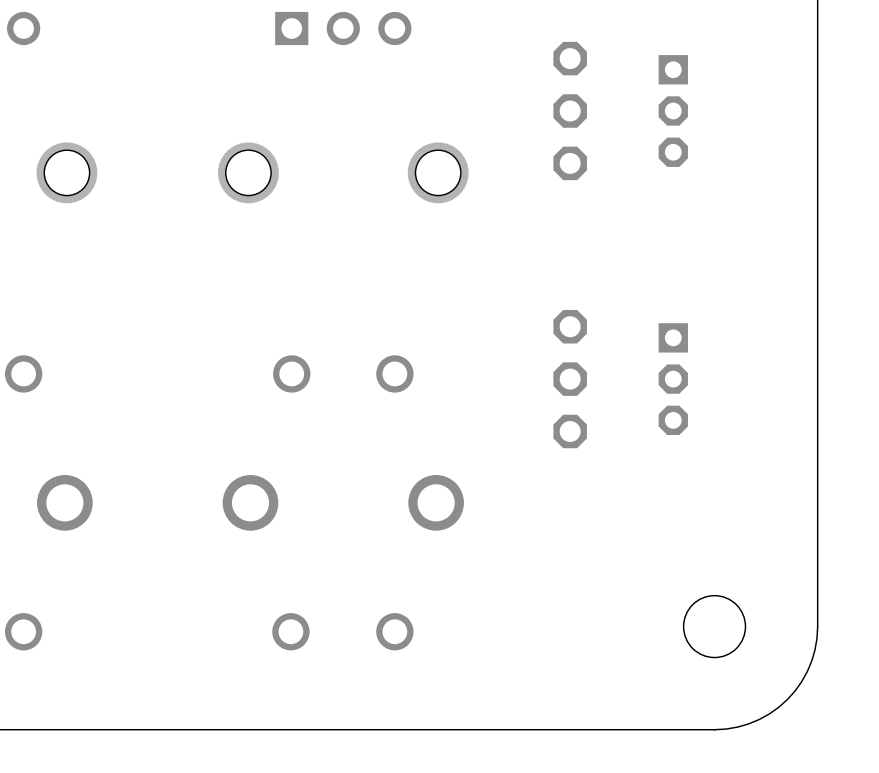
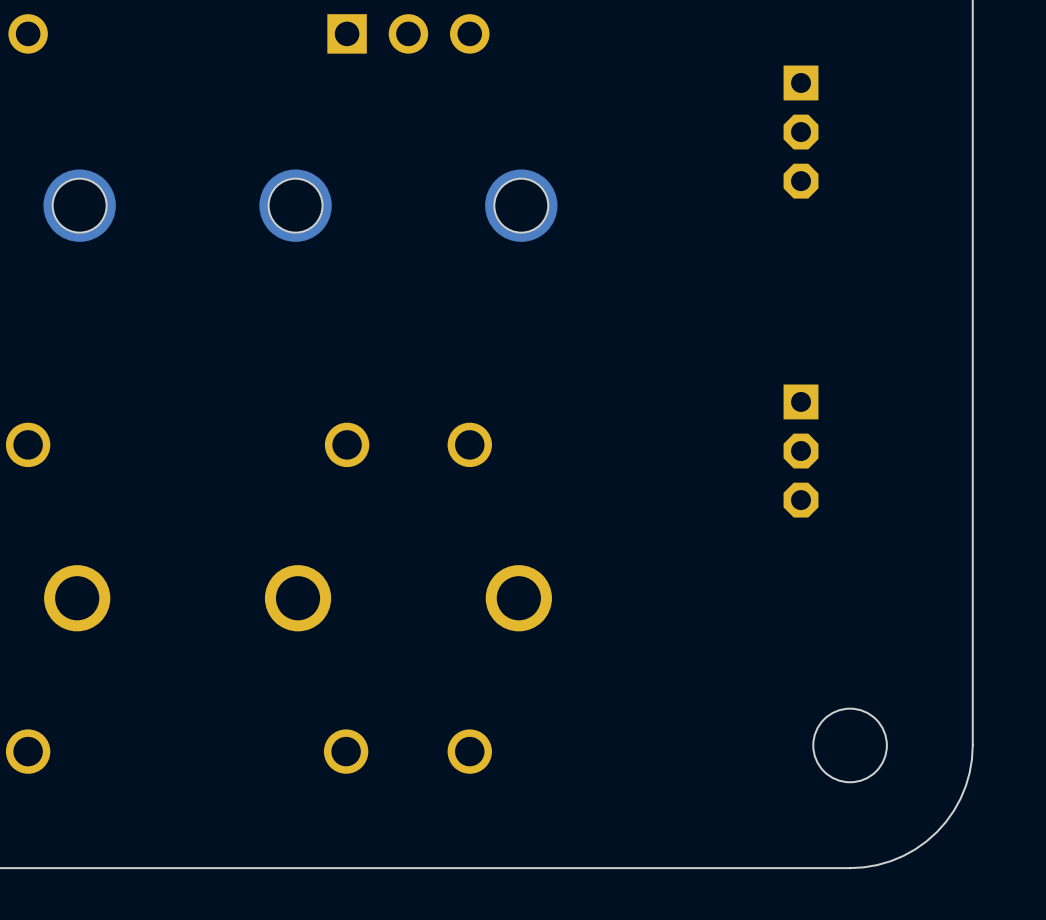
part: (570, 111) -> none
part: (570, 379) -> none

